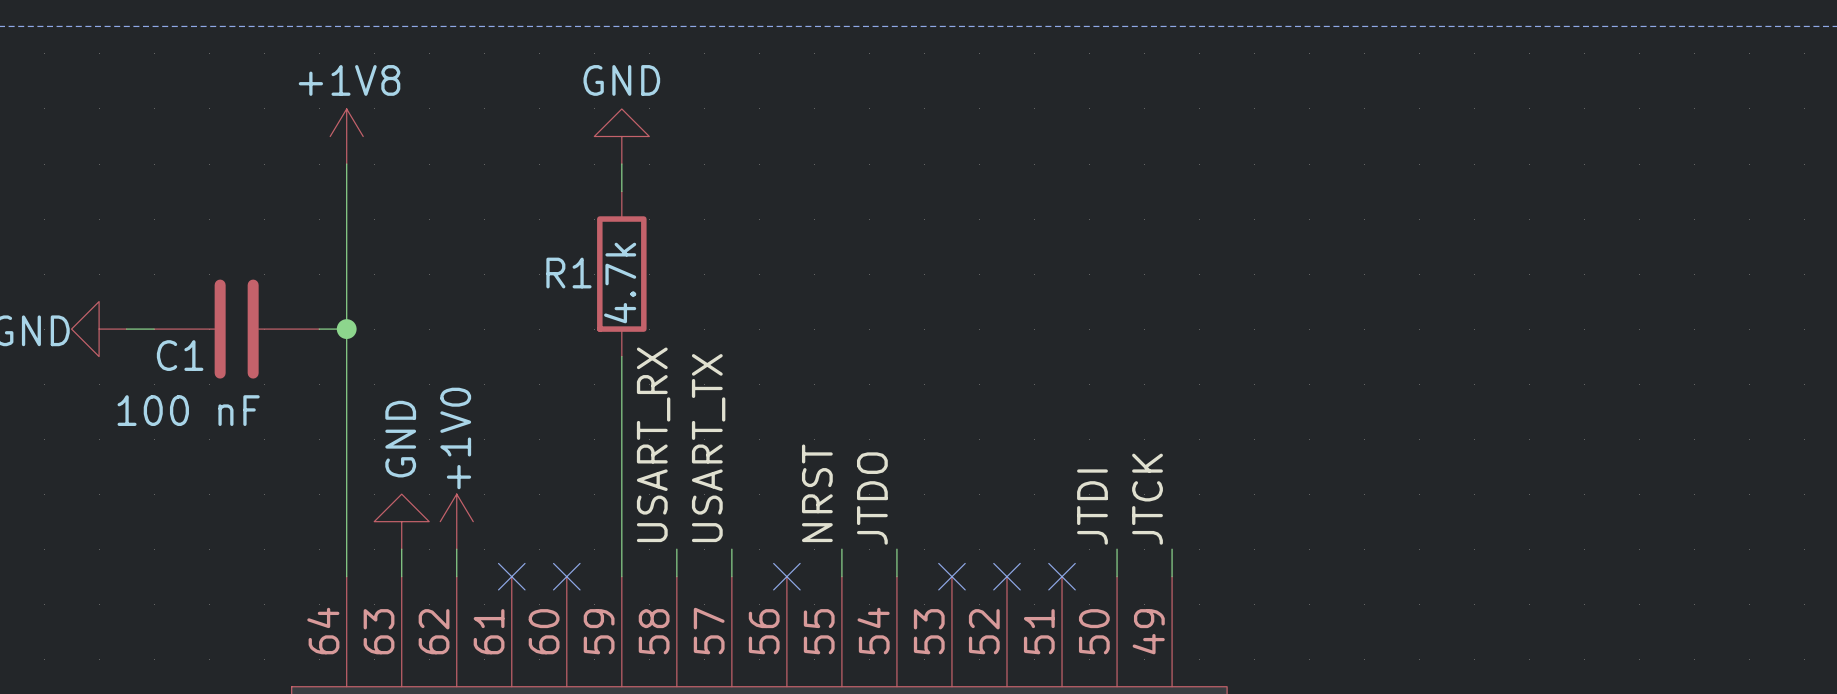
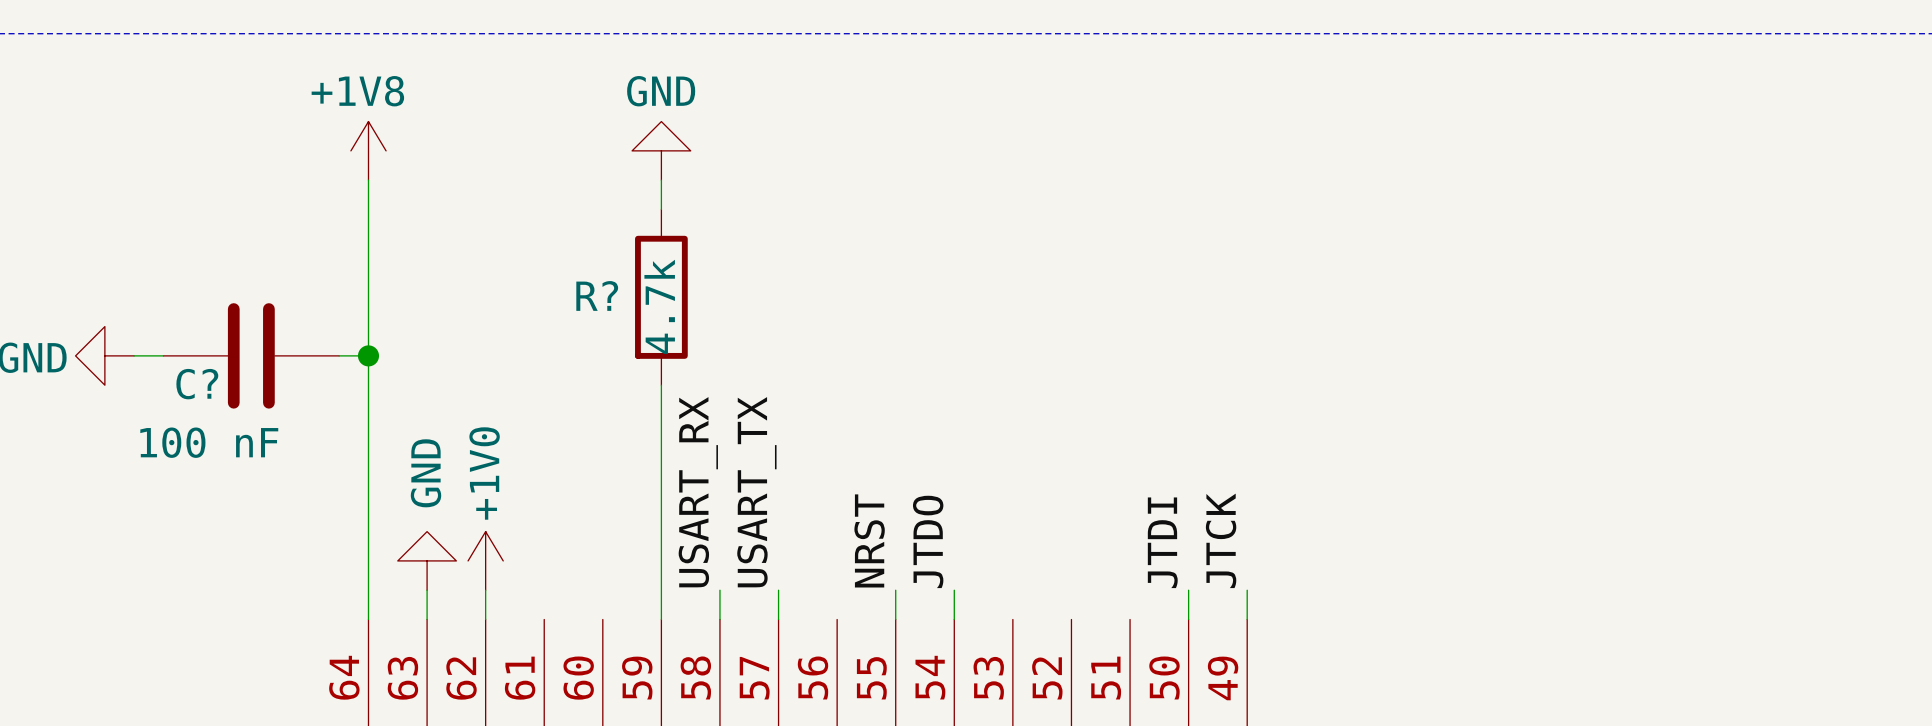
R1 name: R1 (568, 273) -> R? (597, 295)
C1 name: C1 (180, 355) -> C? (197, 384)
no-connect mark: (511, 576) -> none
no-connect mark: (566, 576) -> none
no-connect mark: (786, 576) -> none
no-connect mark: (951, 576) -> none
no-connect mark: (1006, 576) -> none
no-connect mark: (1062, 576) -> none

